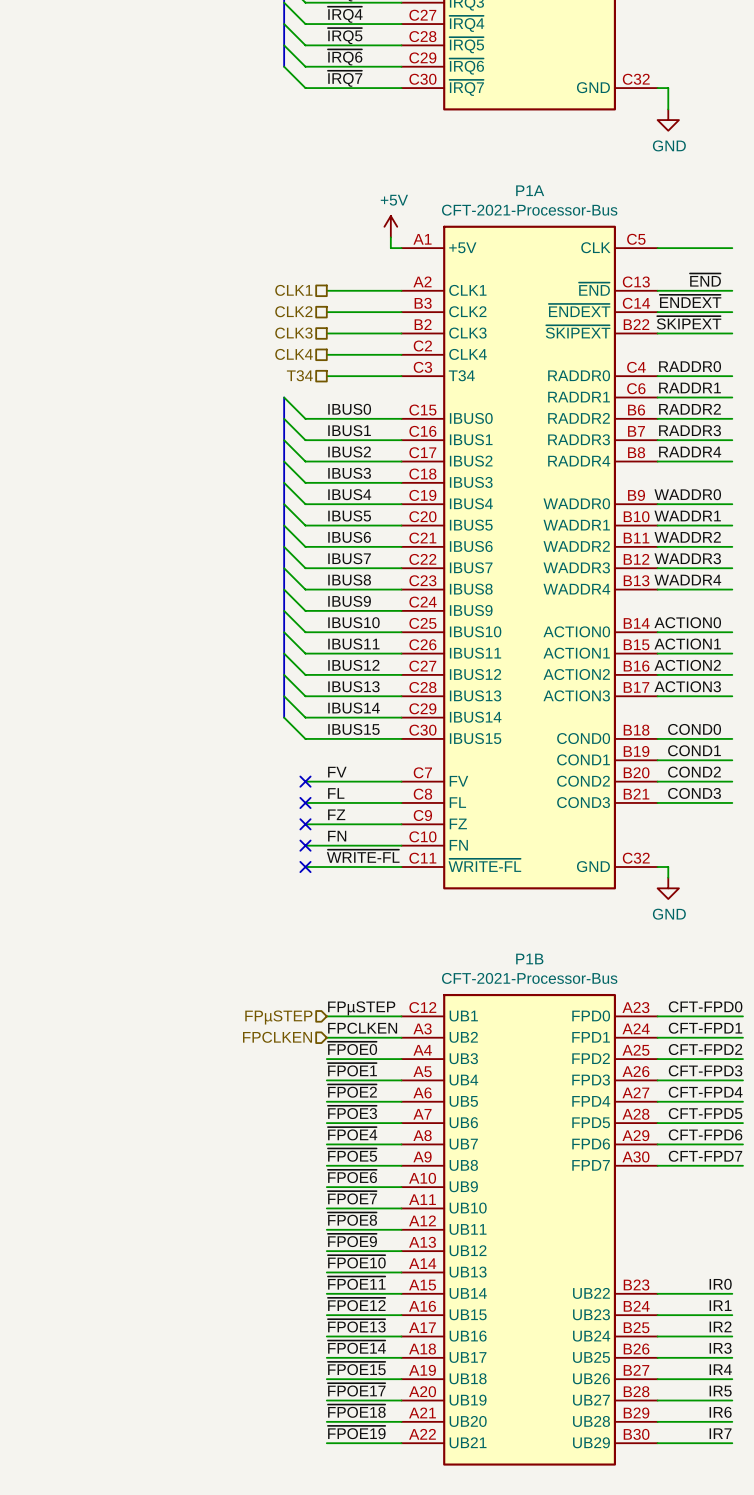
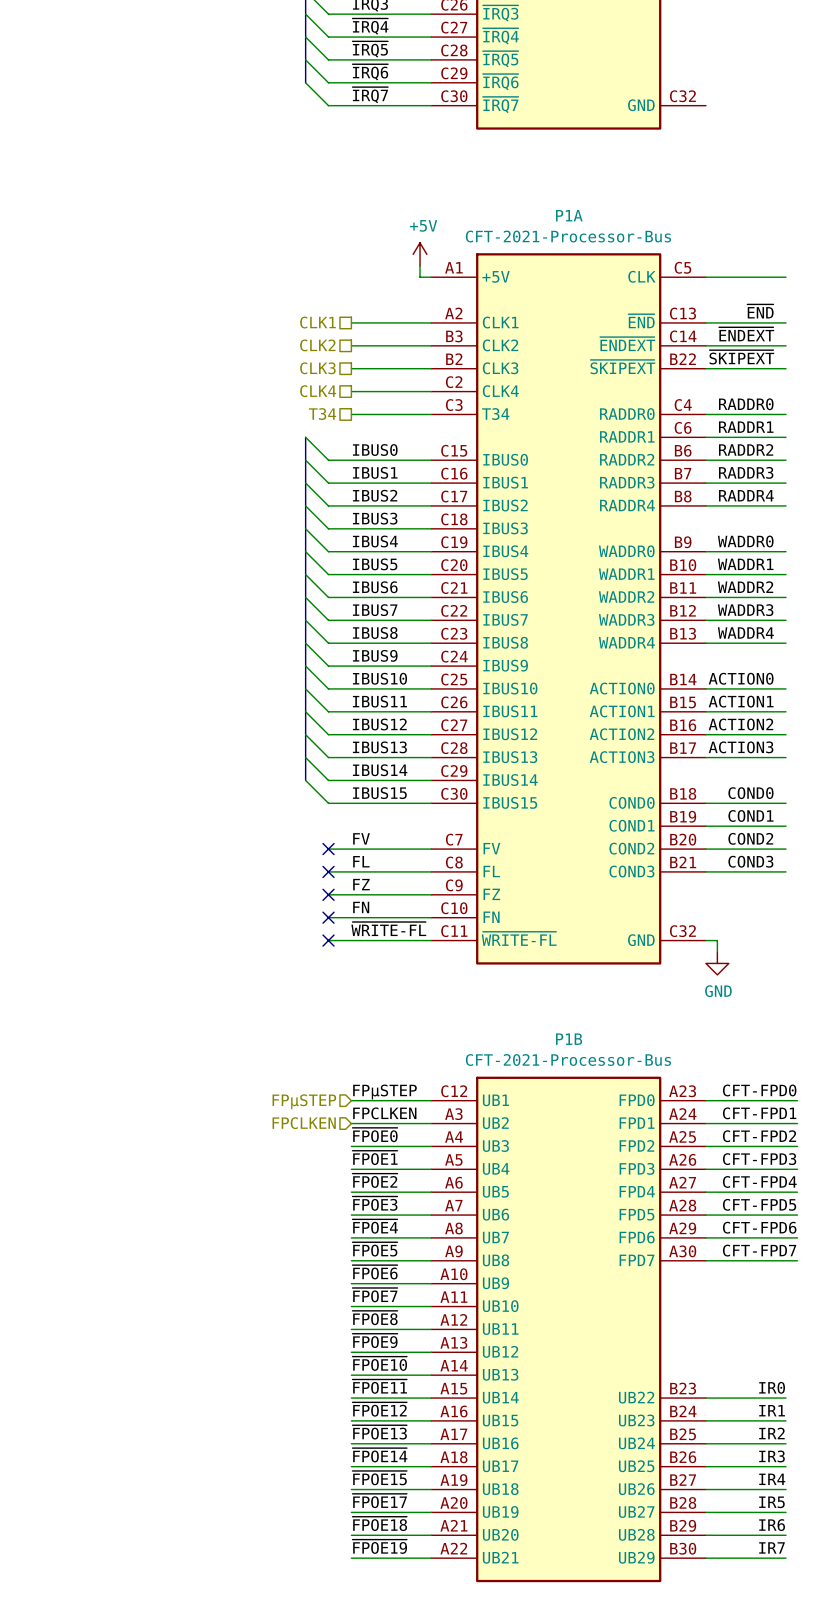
wire: (657, 88) (668, 88) (668, 109) -> none
power symbol: GND (668, 120) -> none

